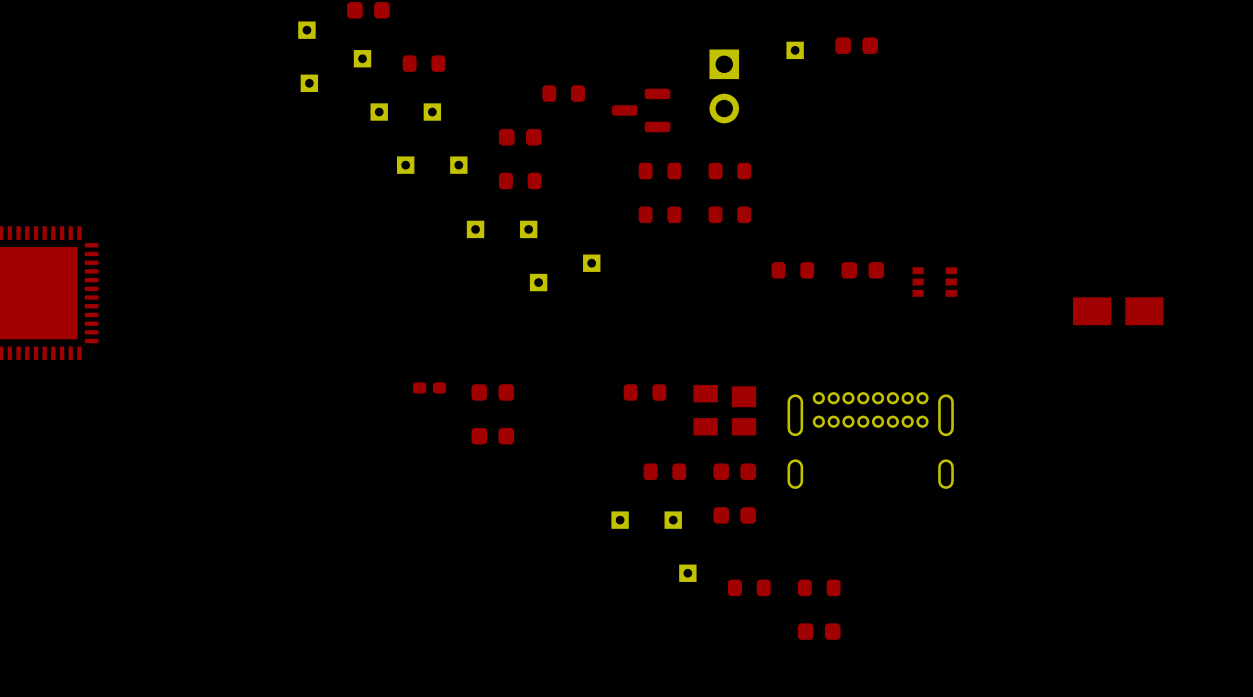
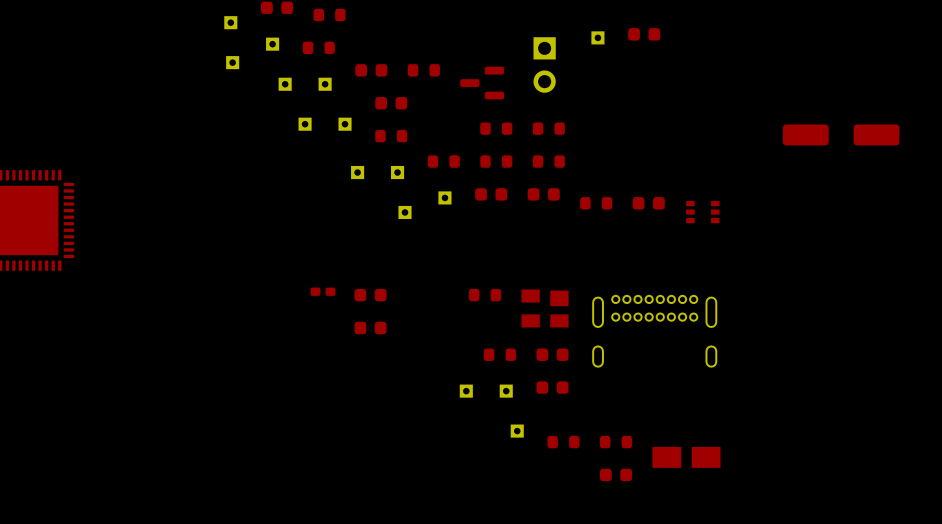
part: none -> (329, 14)
part: none -> (371, 70)
part: none -> (841, 134)
part: none -> (443, 161)
part: none -> (491, 194)
part: none -> (543, 194)
part position: (1118, 311) -> (686, 457)

